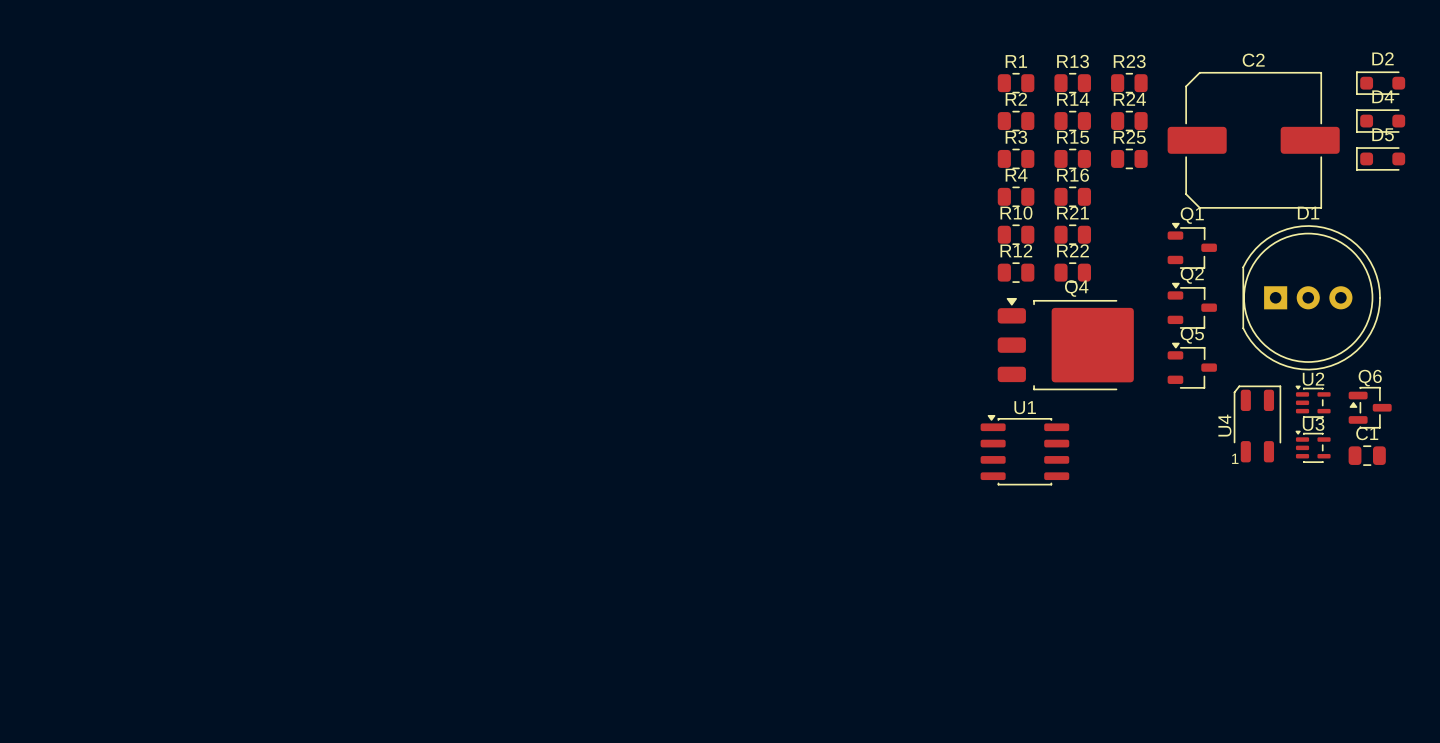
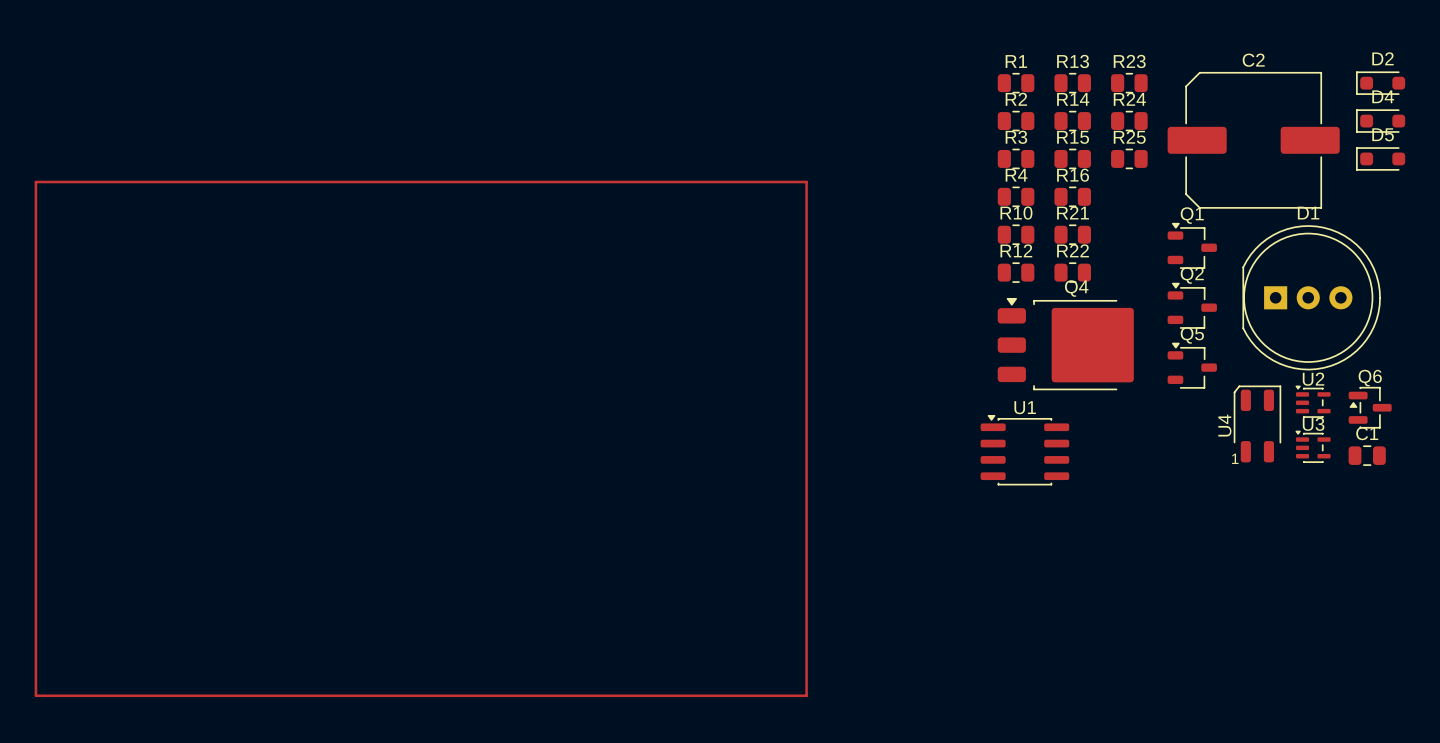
track: none -> (35, 182) (806, 182) (806, 695) (35, 695) (35, 182)

